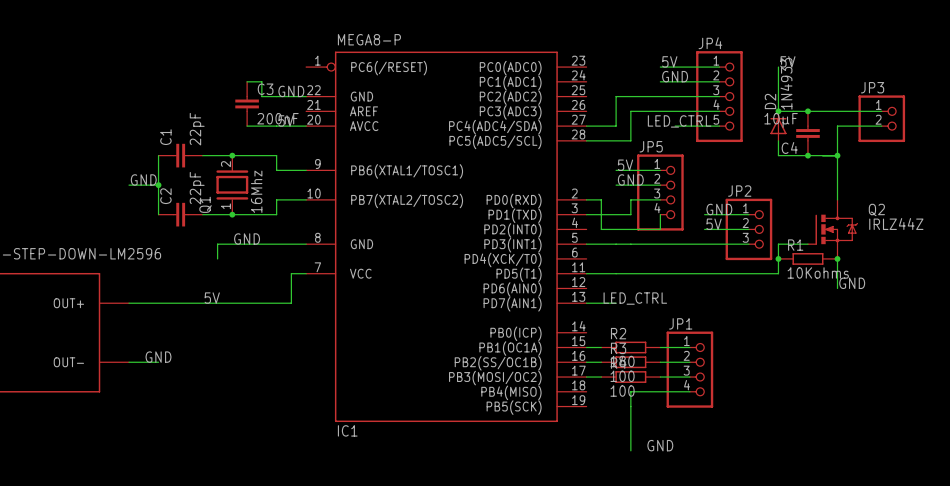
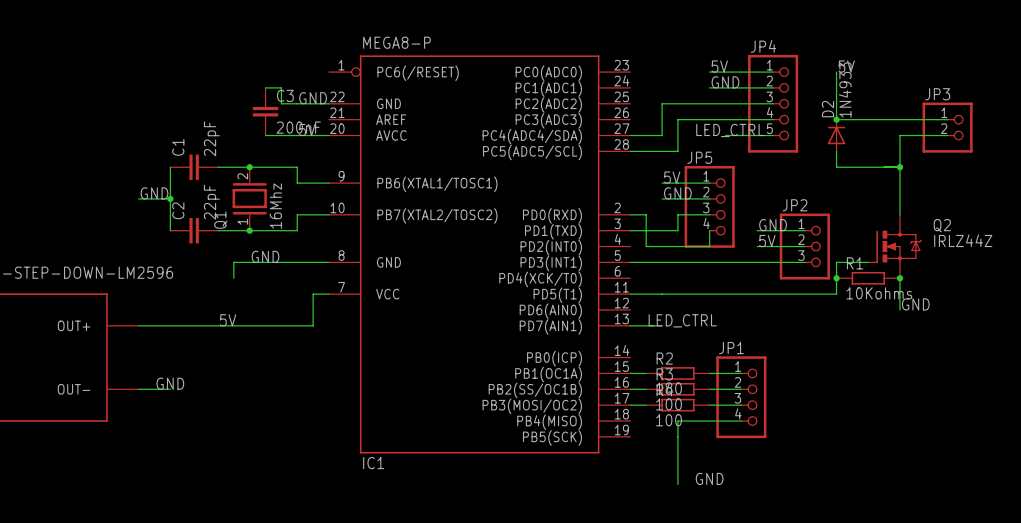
junction: (807, 111) -> none
C4: 10µF (807, 133) -> none
junction: (807, 155) -> none

